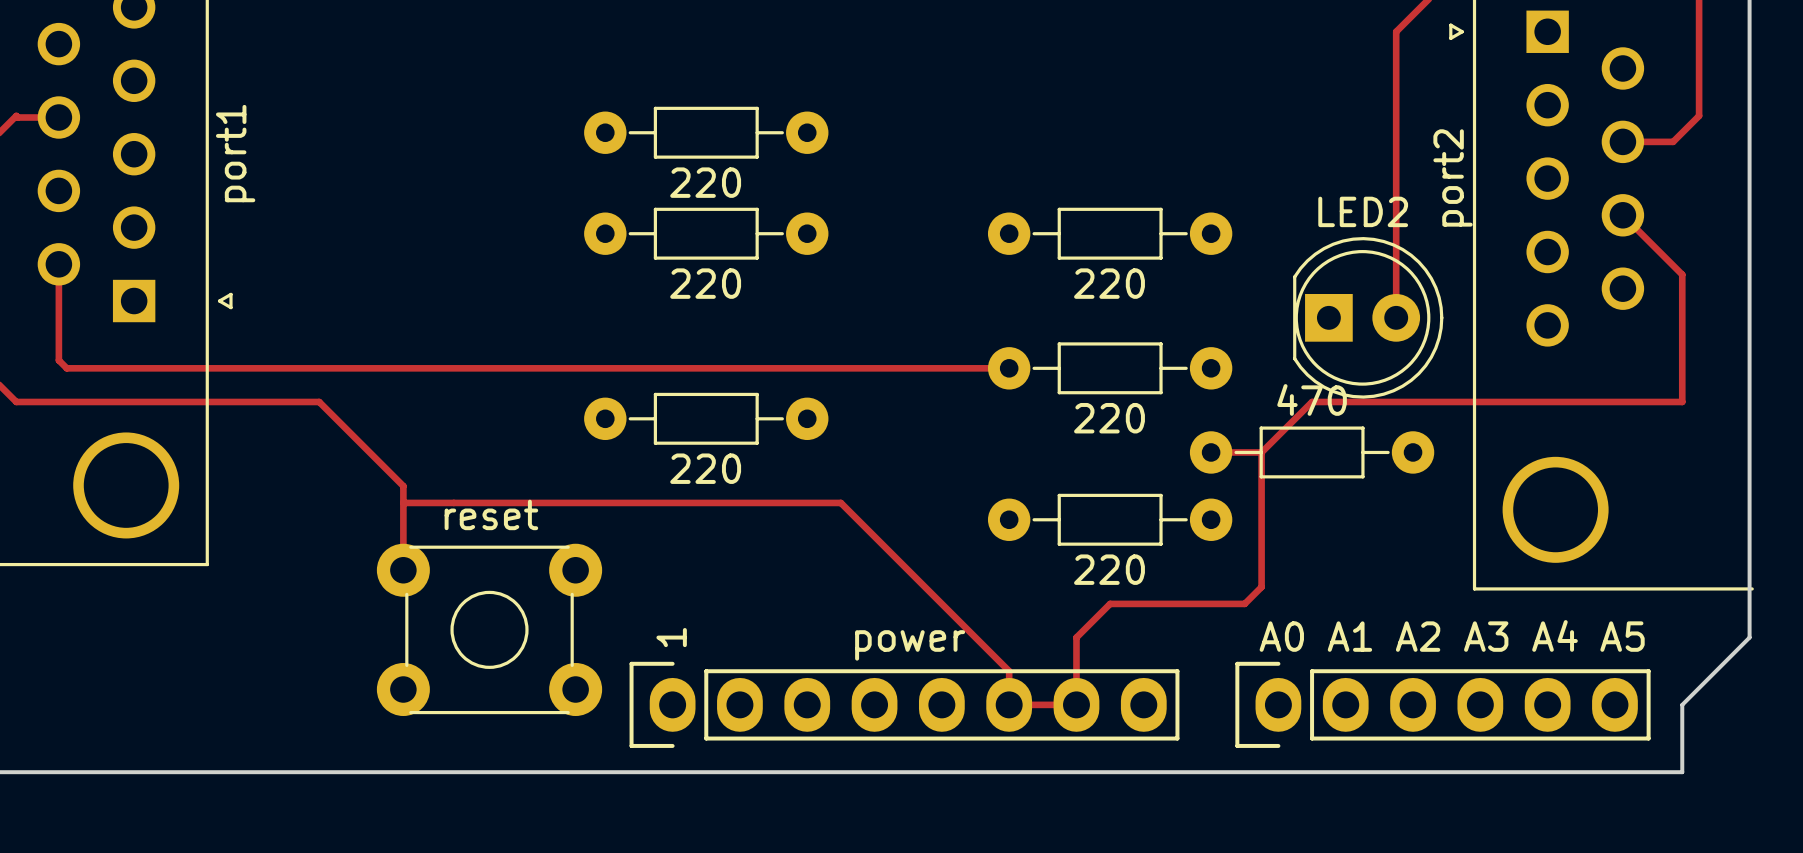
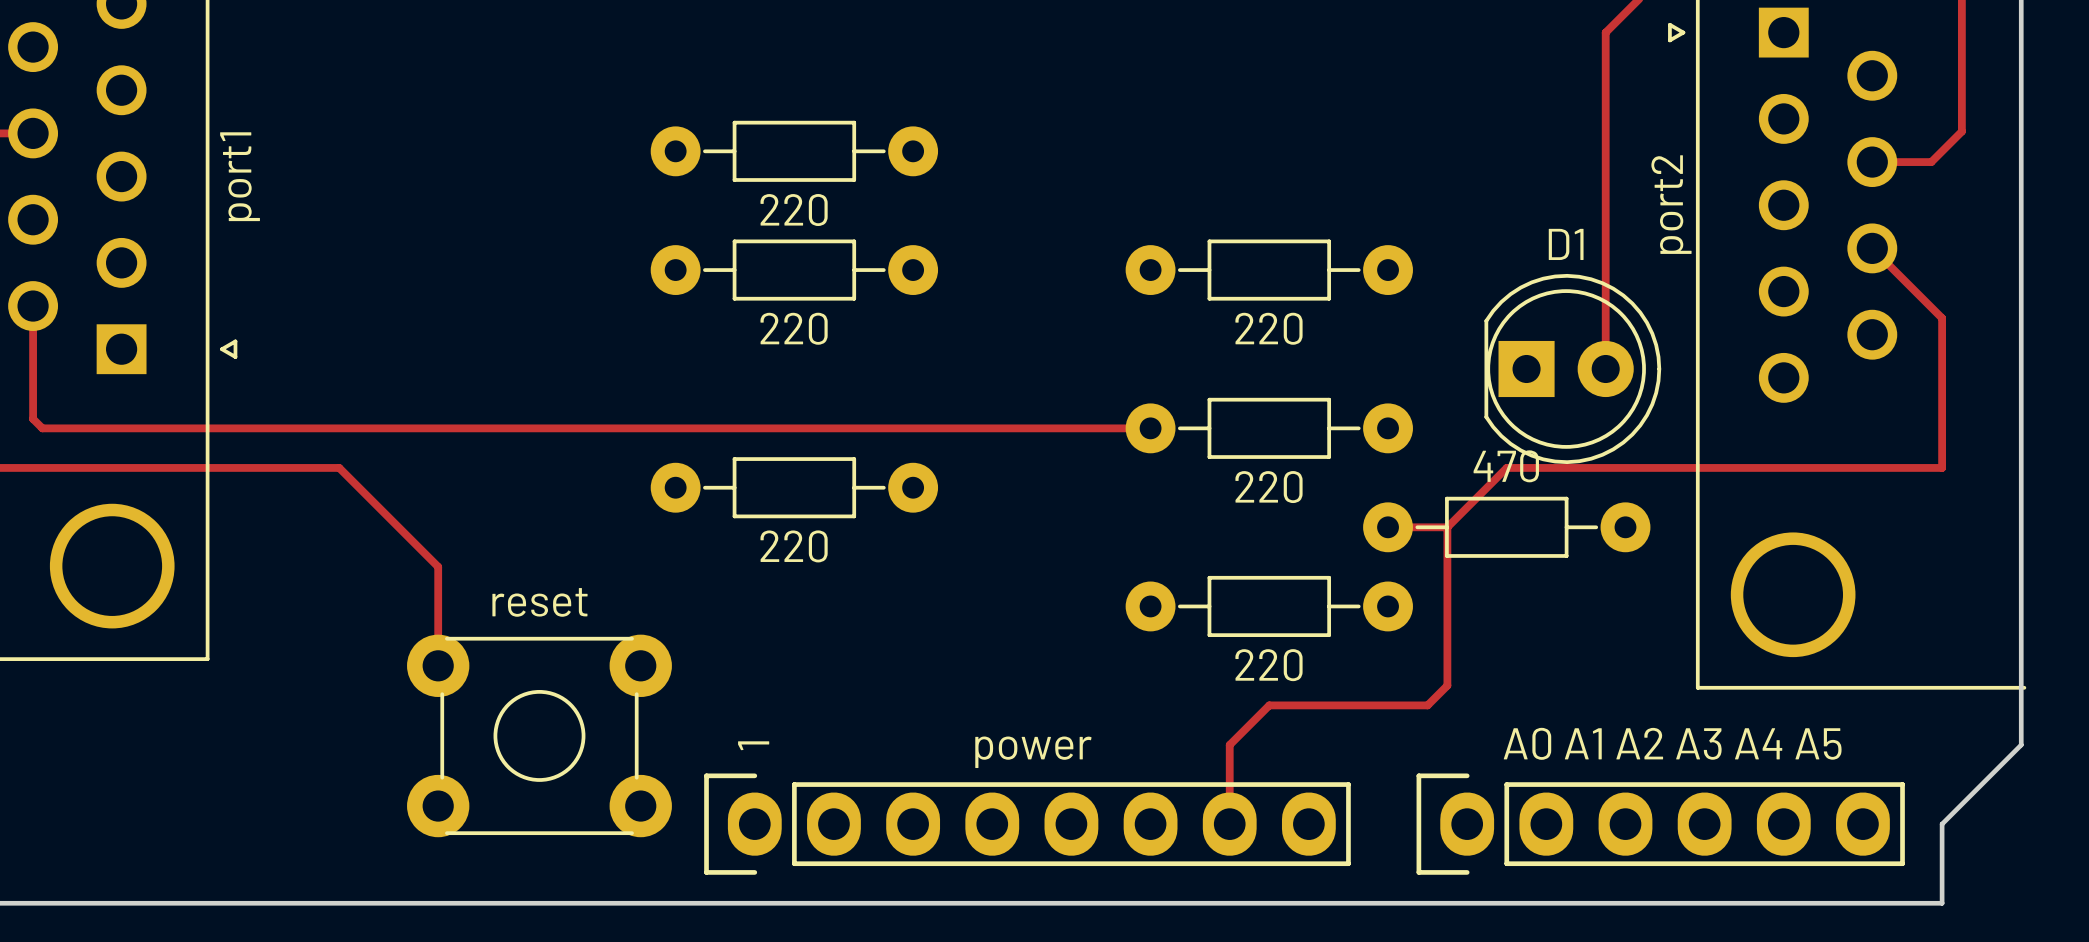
LED2 name: LED2 (1363, 211) -> D1 (1566, 244)
track: (403, 502) (840, 502) (1009, 671) (1009, 704) (1076, 704) -> none

